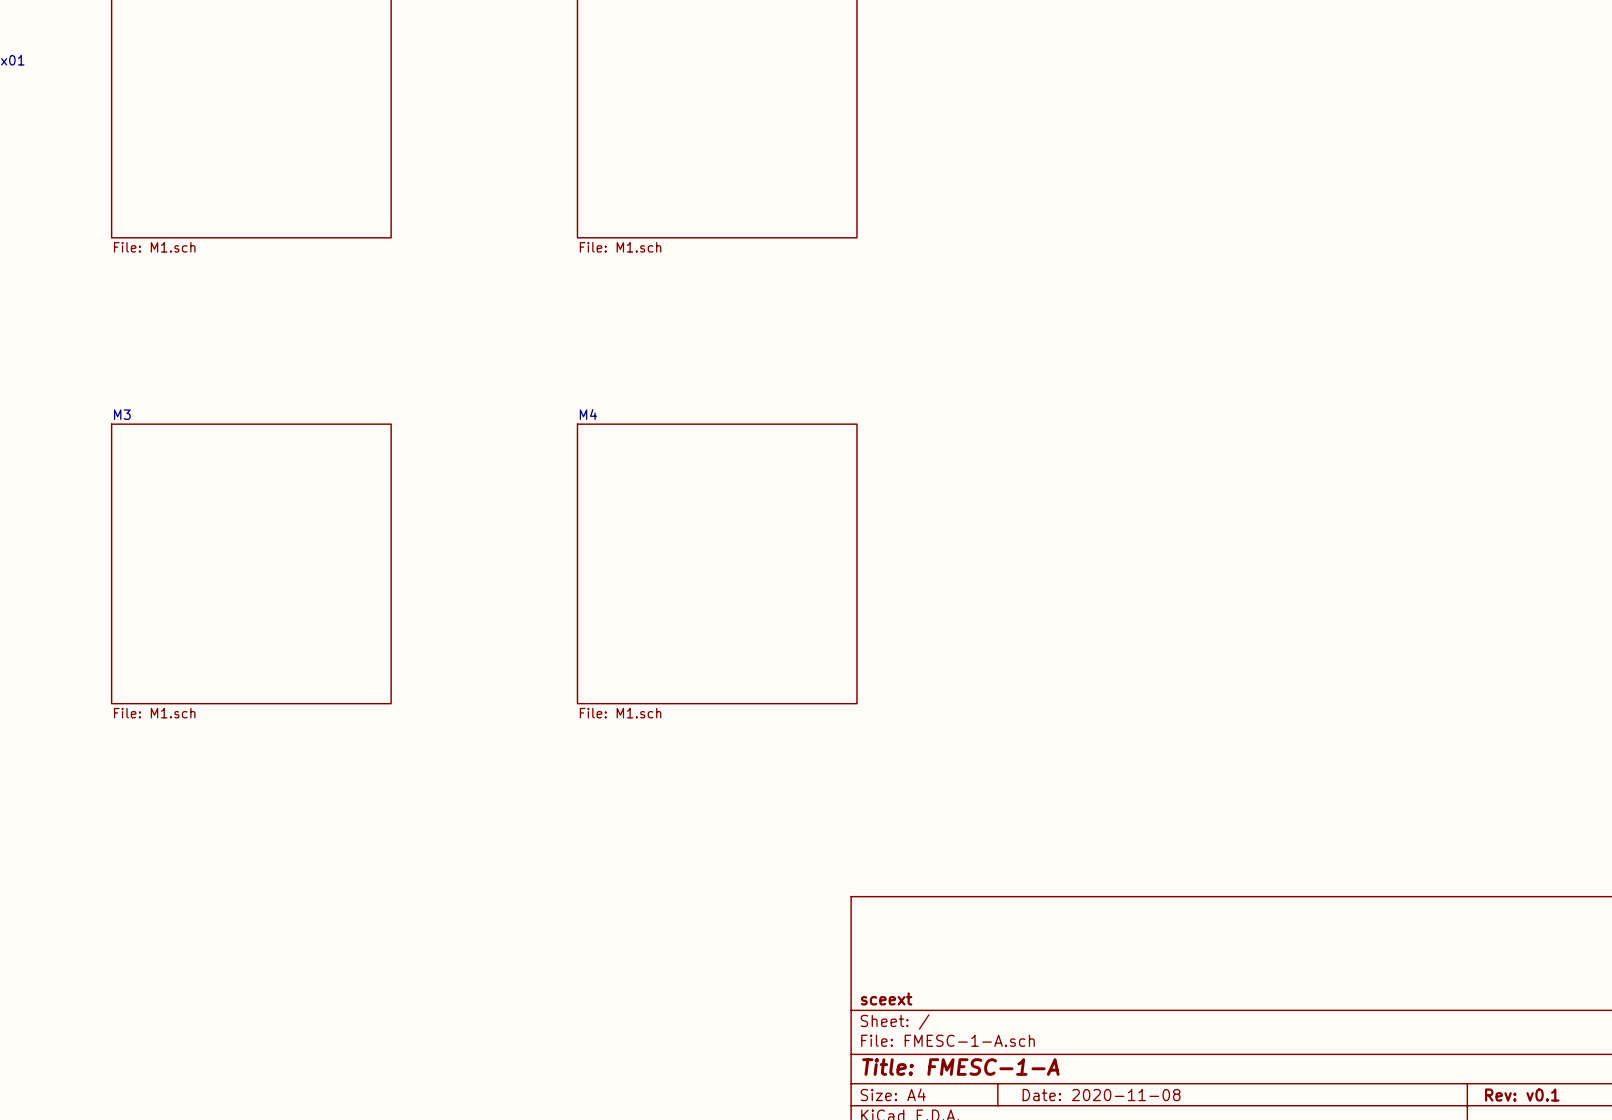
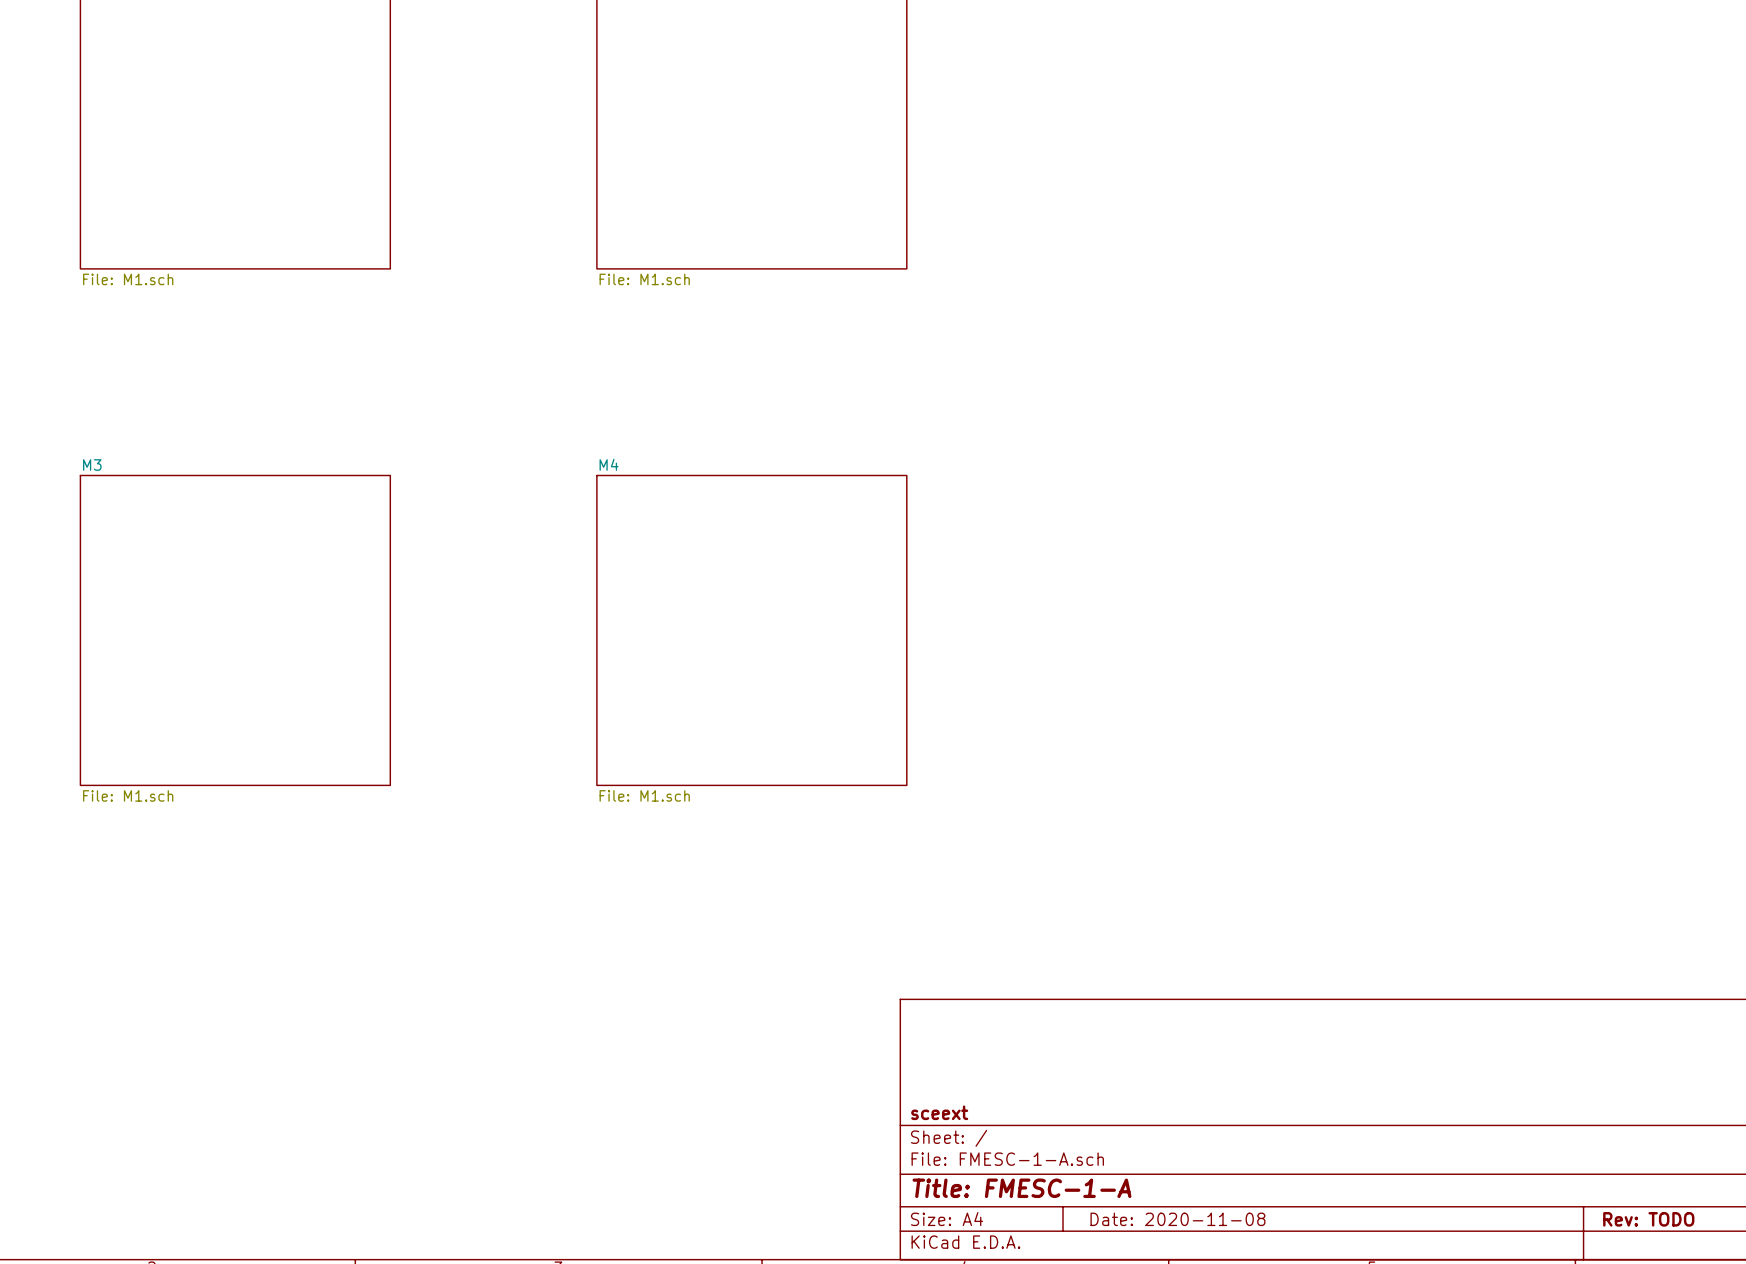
title block: Rev: v0.1 (1522, 1095) -> Rev: TODO (1648, 1219)

